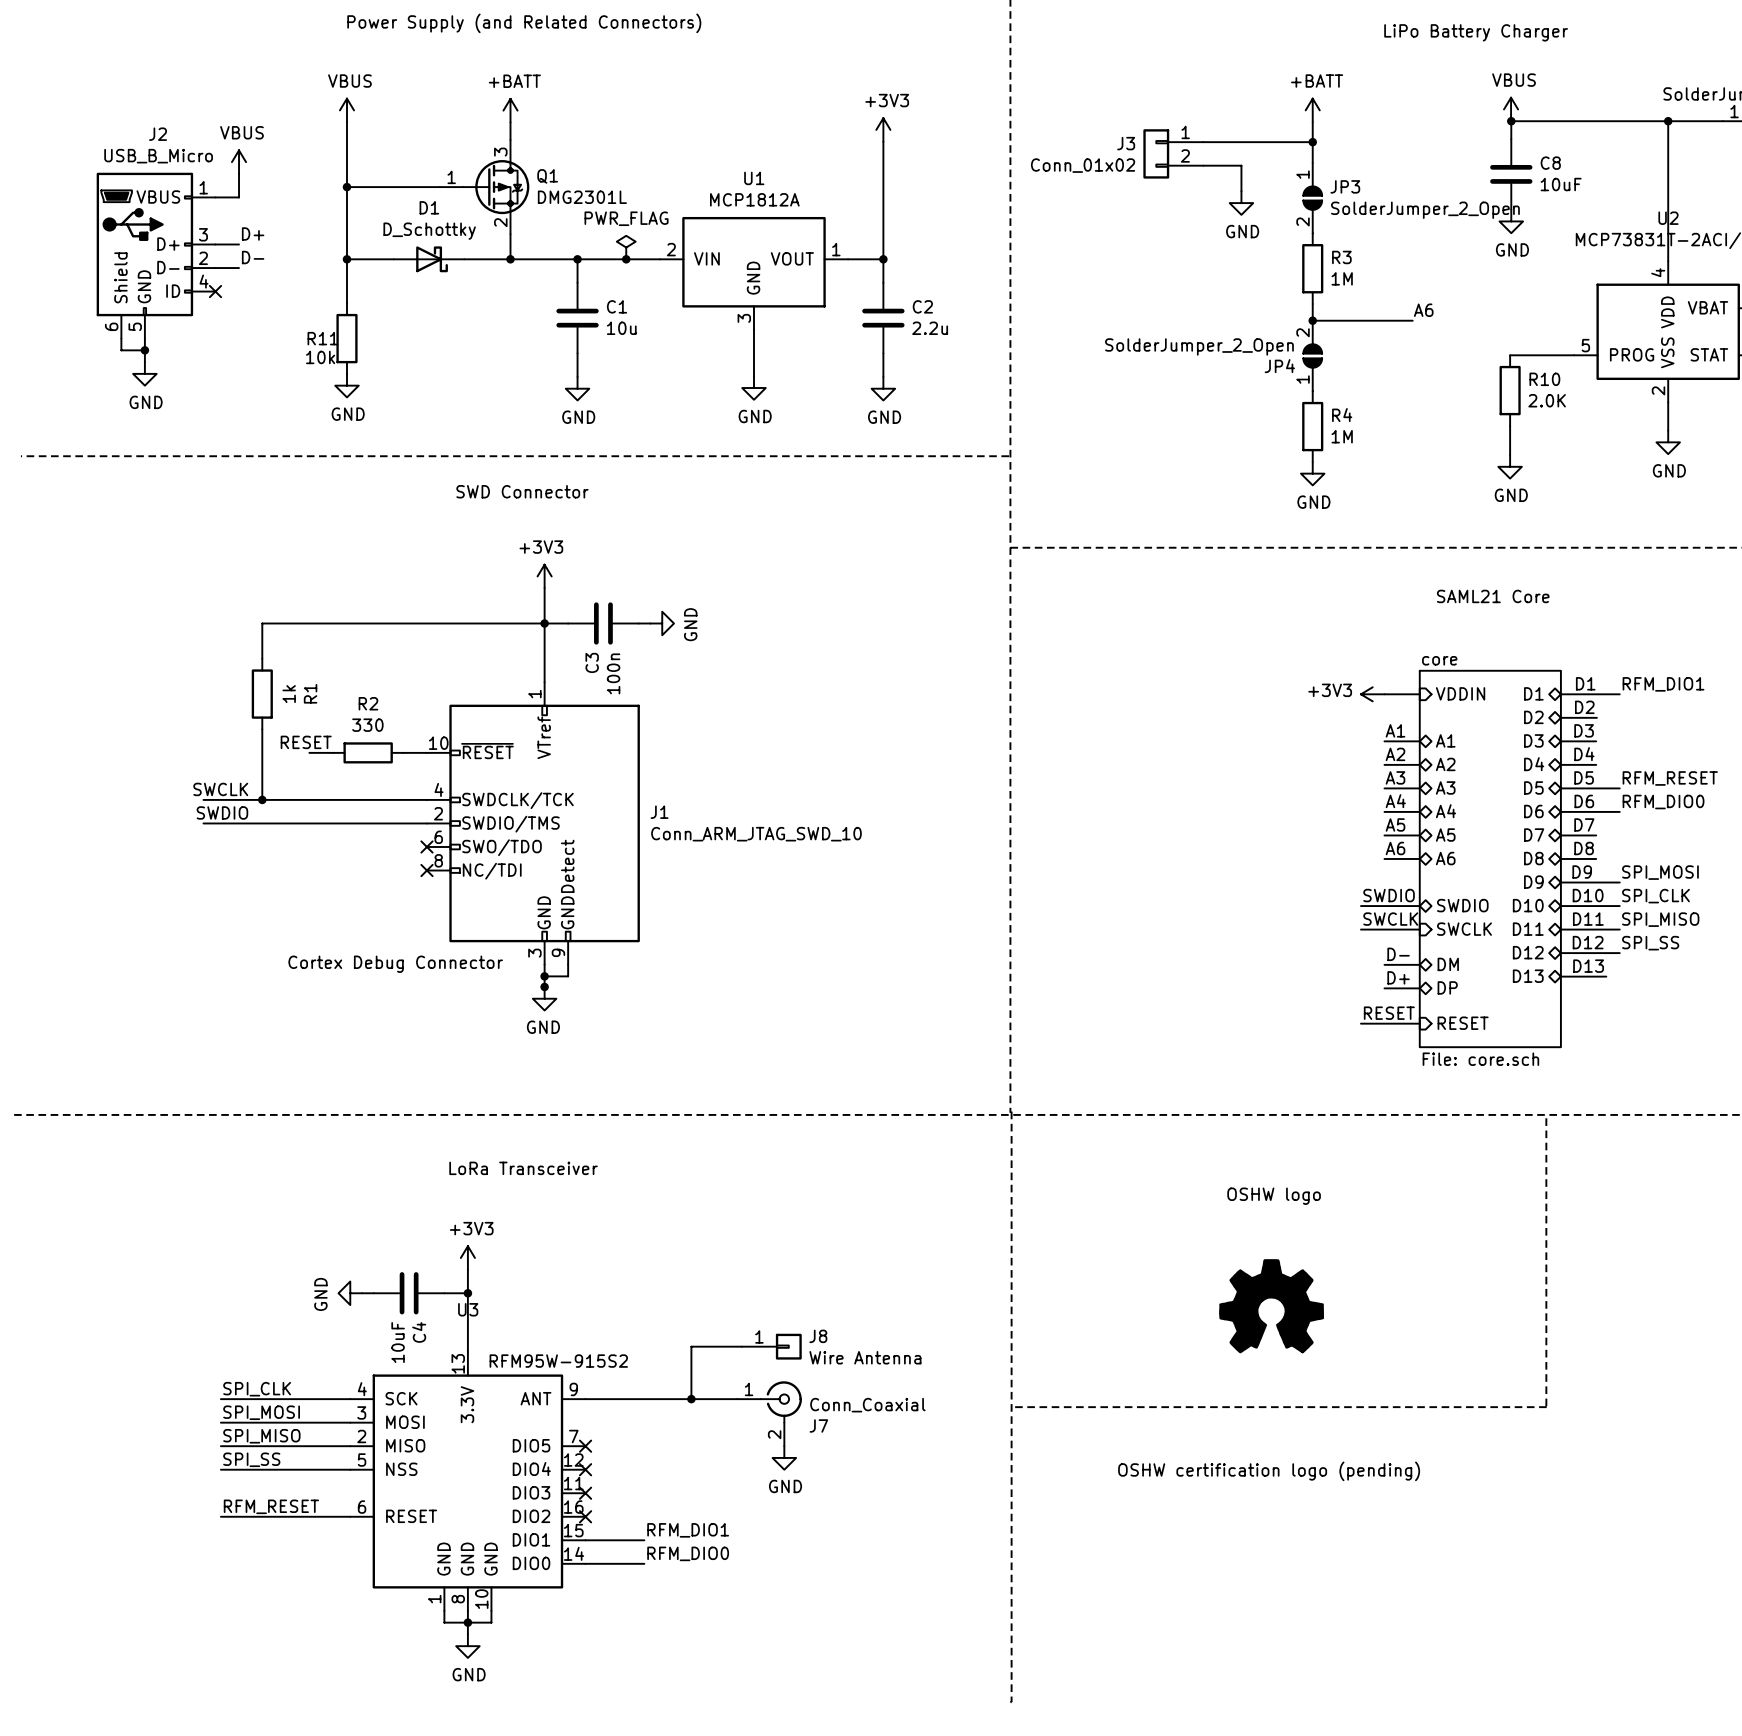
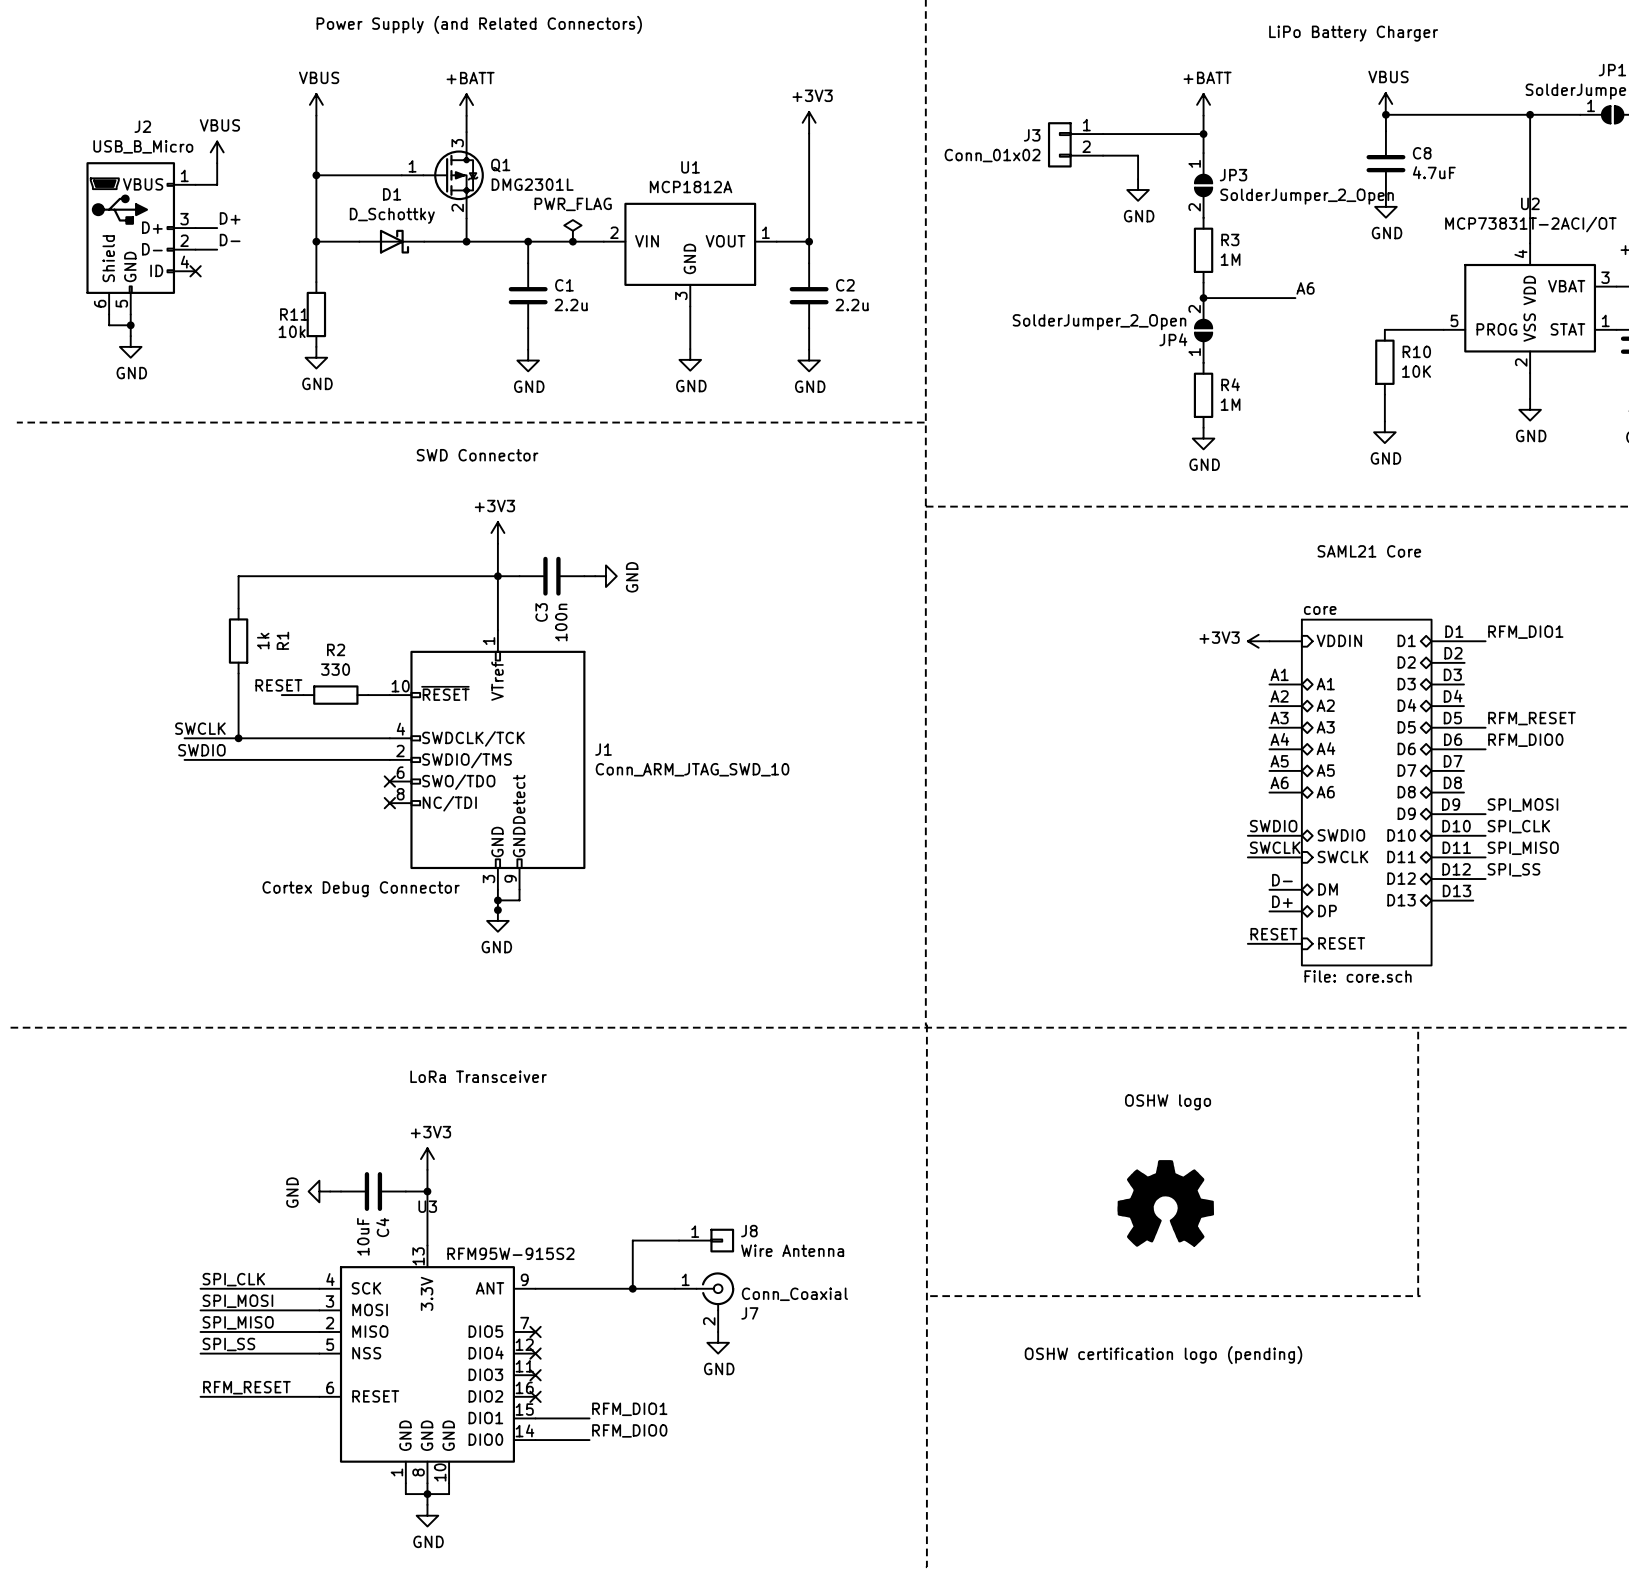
C8 value: 10uF (1561, 184) -> 4.7uF (1434, 172)
C1 value: 10u (621, 328) -> 2.2u (571, 305)
R10 value: 2.0K (1547, 400) -> 10K (1416, 371)

